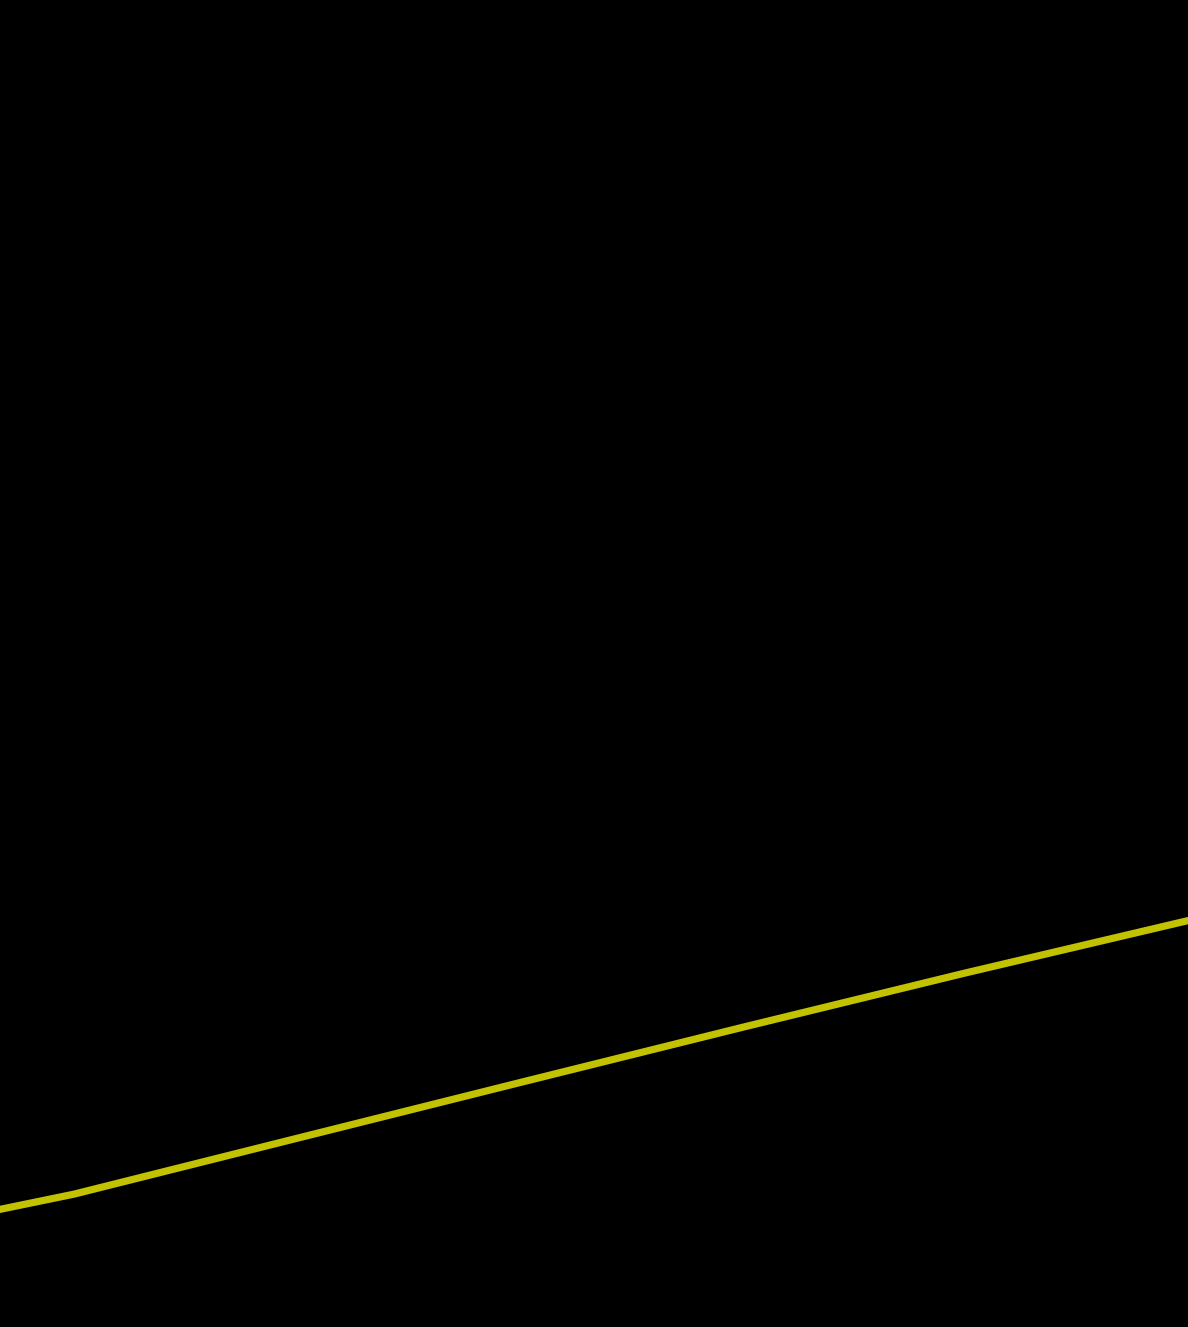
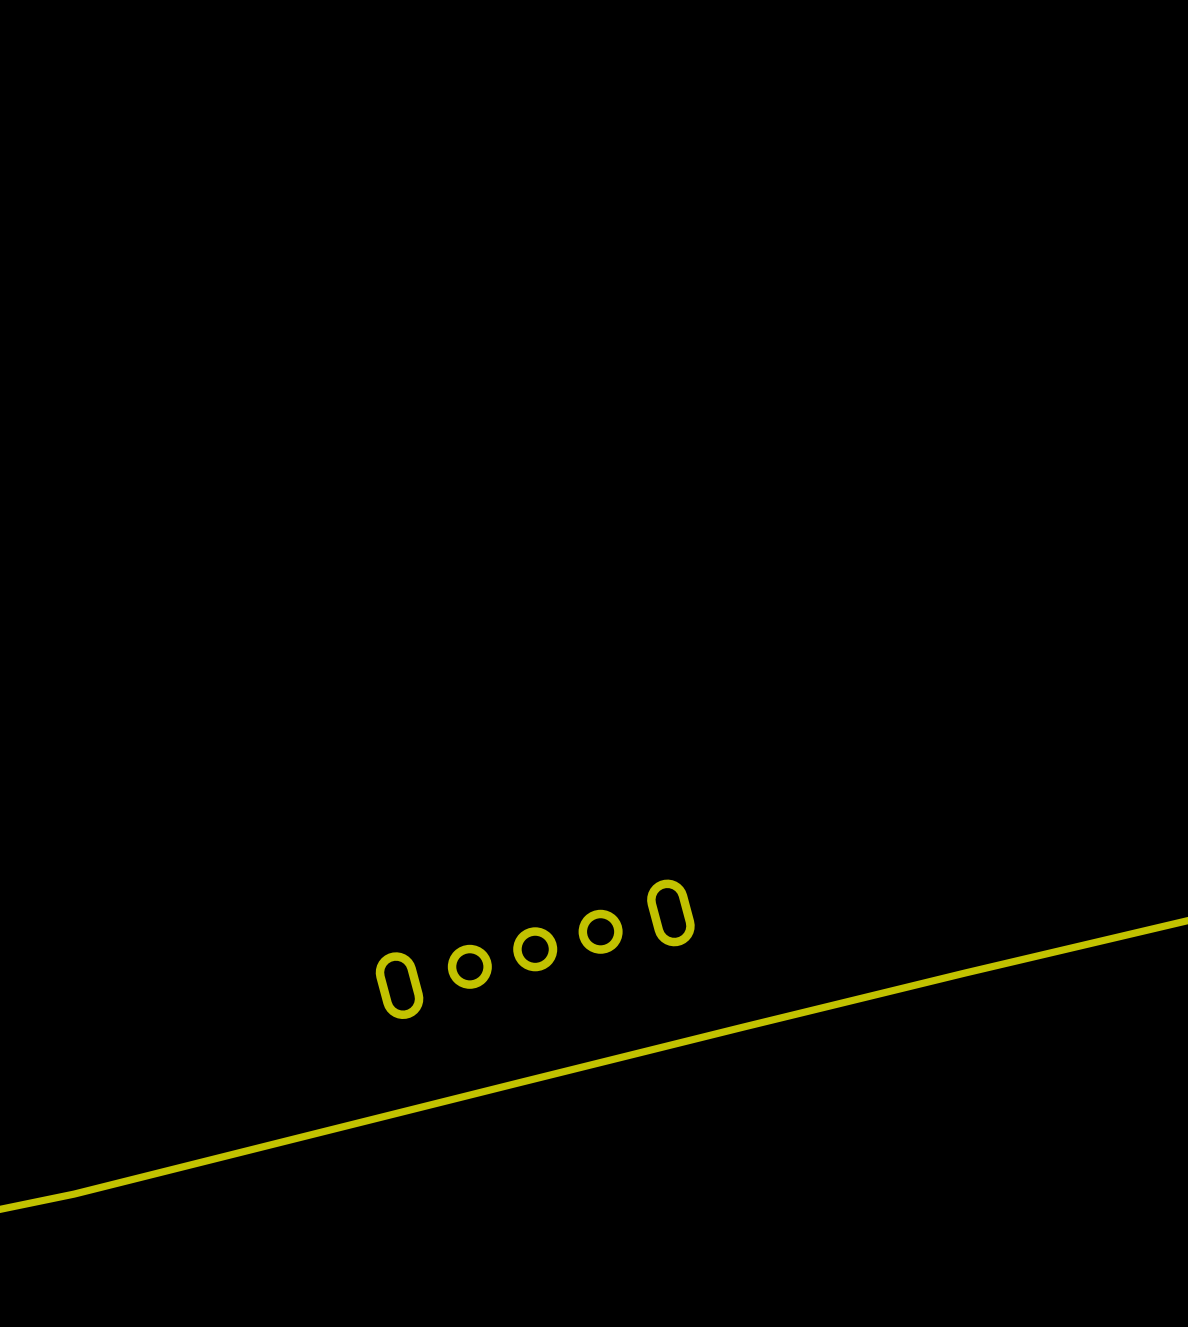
part: none -> (535, 949)

